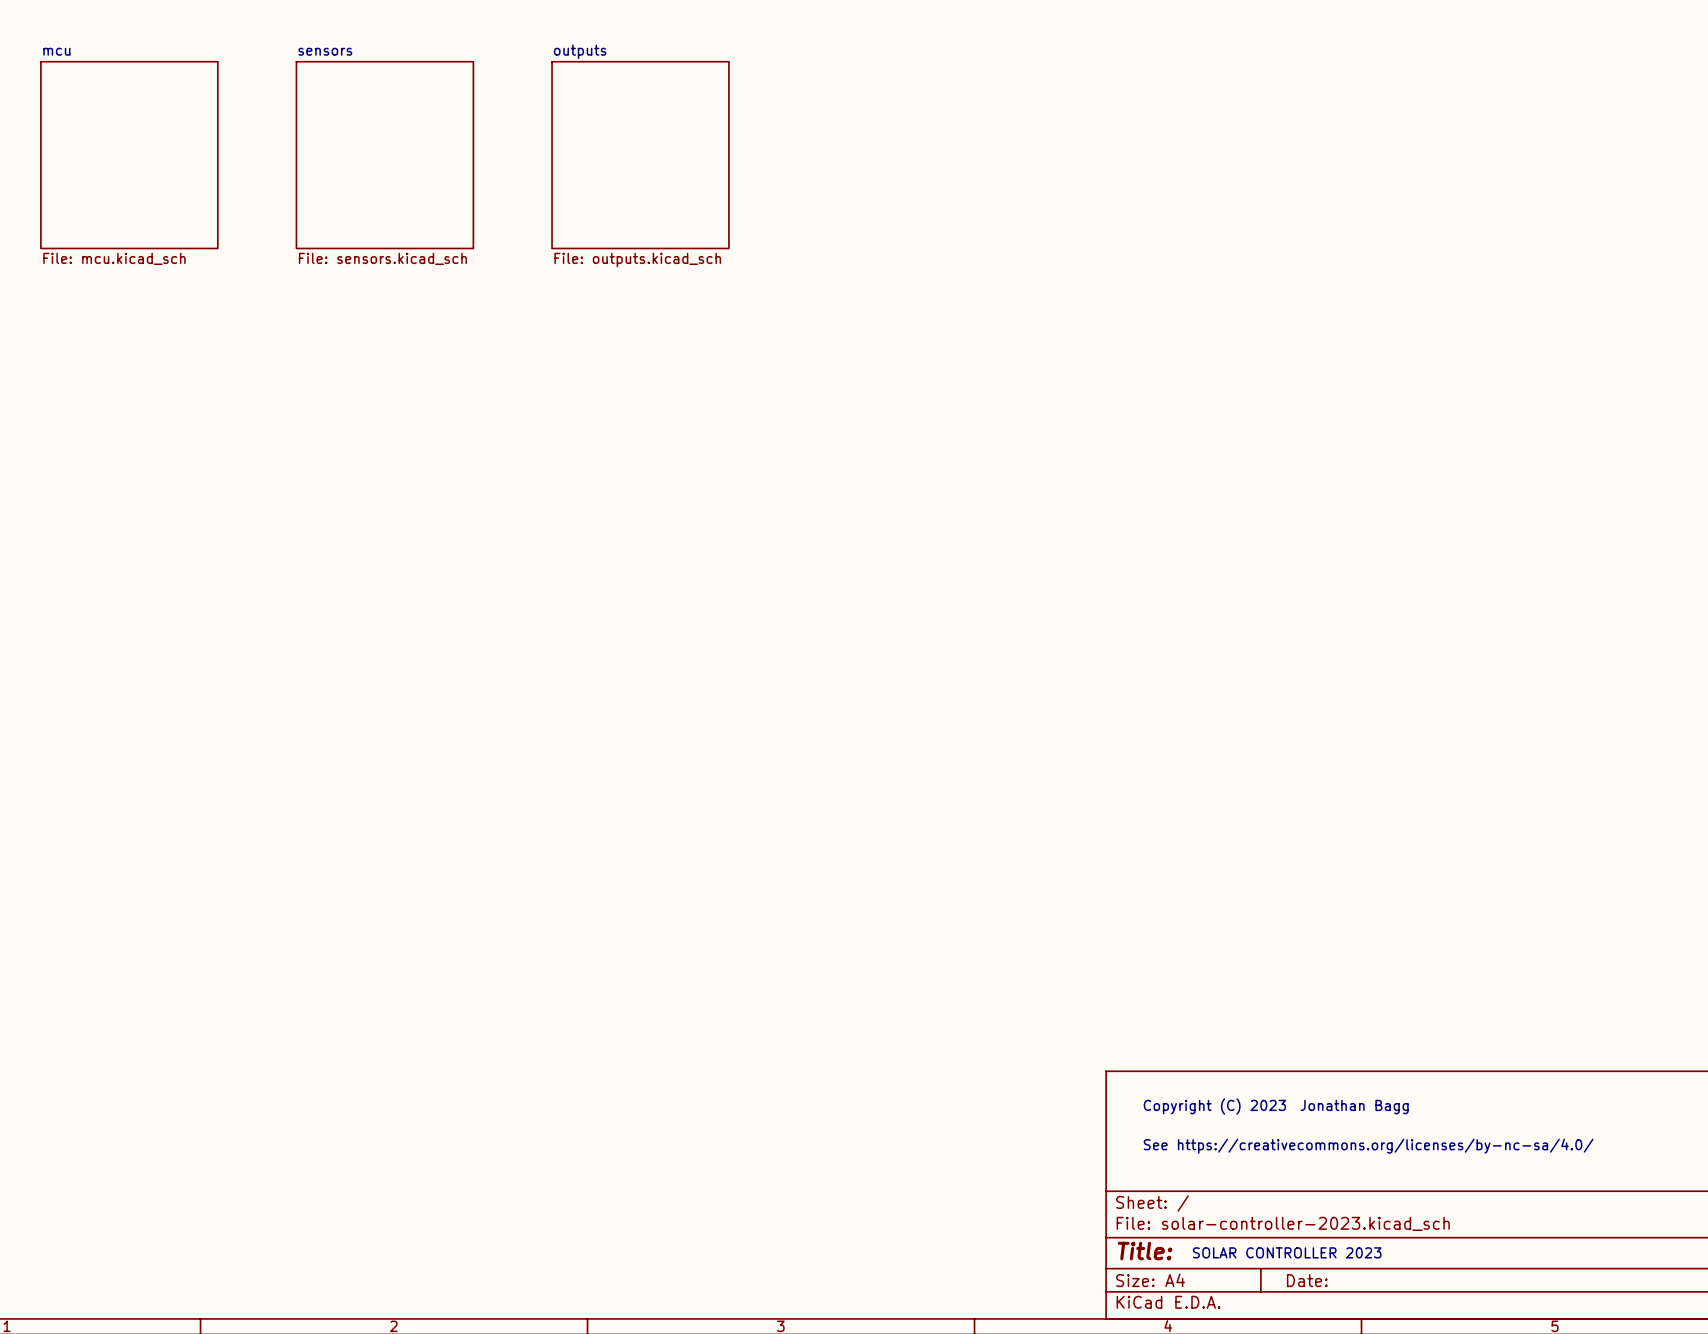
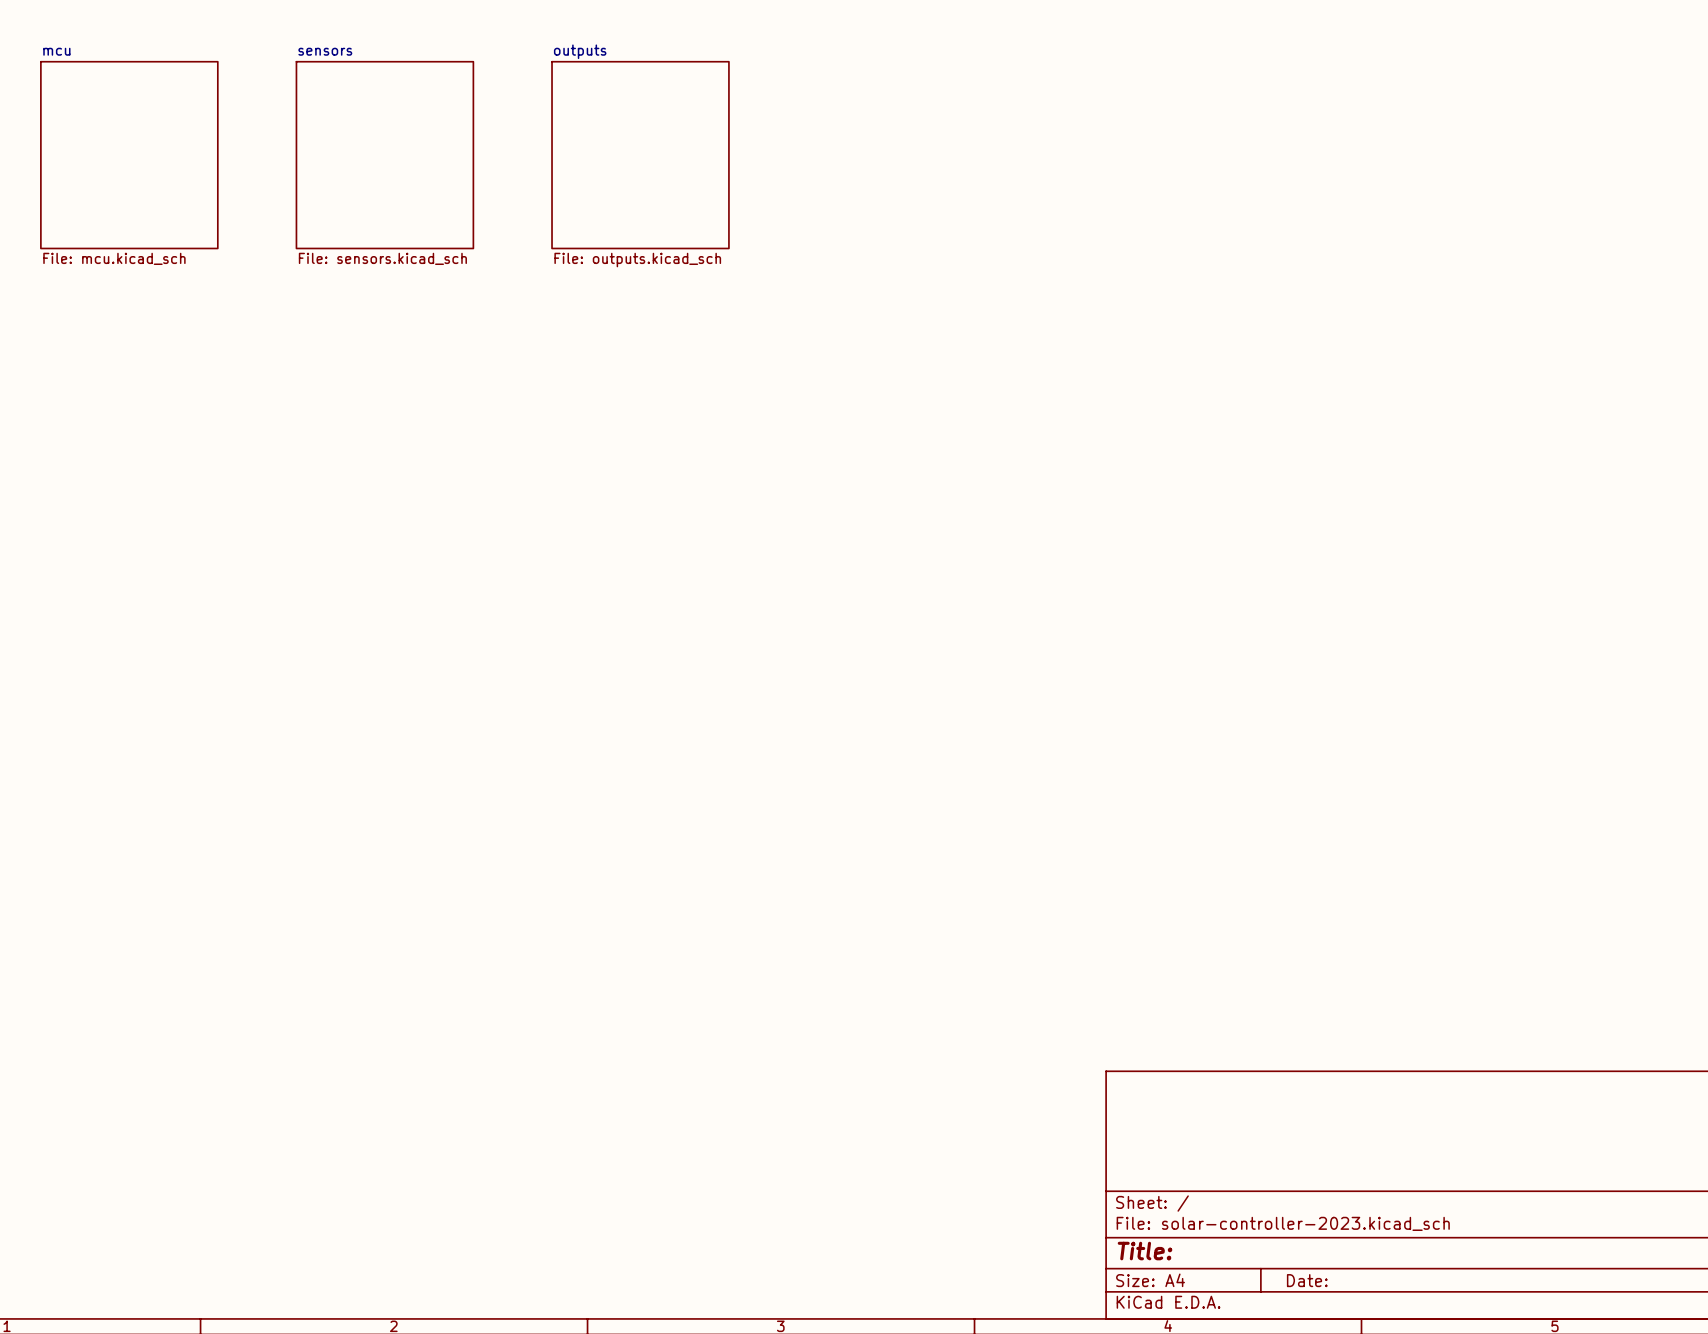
text: Copyright (C) 2023 (1214, 1106) -> none
text: Jonathan Bagg (1354, 1107) -> none
text: See https://creativecommons.org/licenses/by-nc-sa/4.0/ (1368, 1146) -> none
text: SOLAR CONTROLLER 2023 (1287, 1252) -> none

